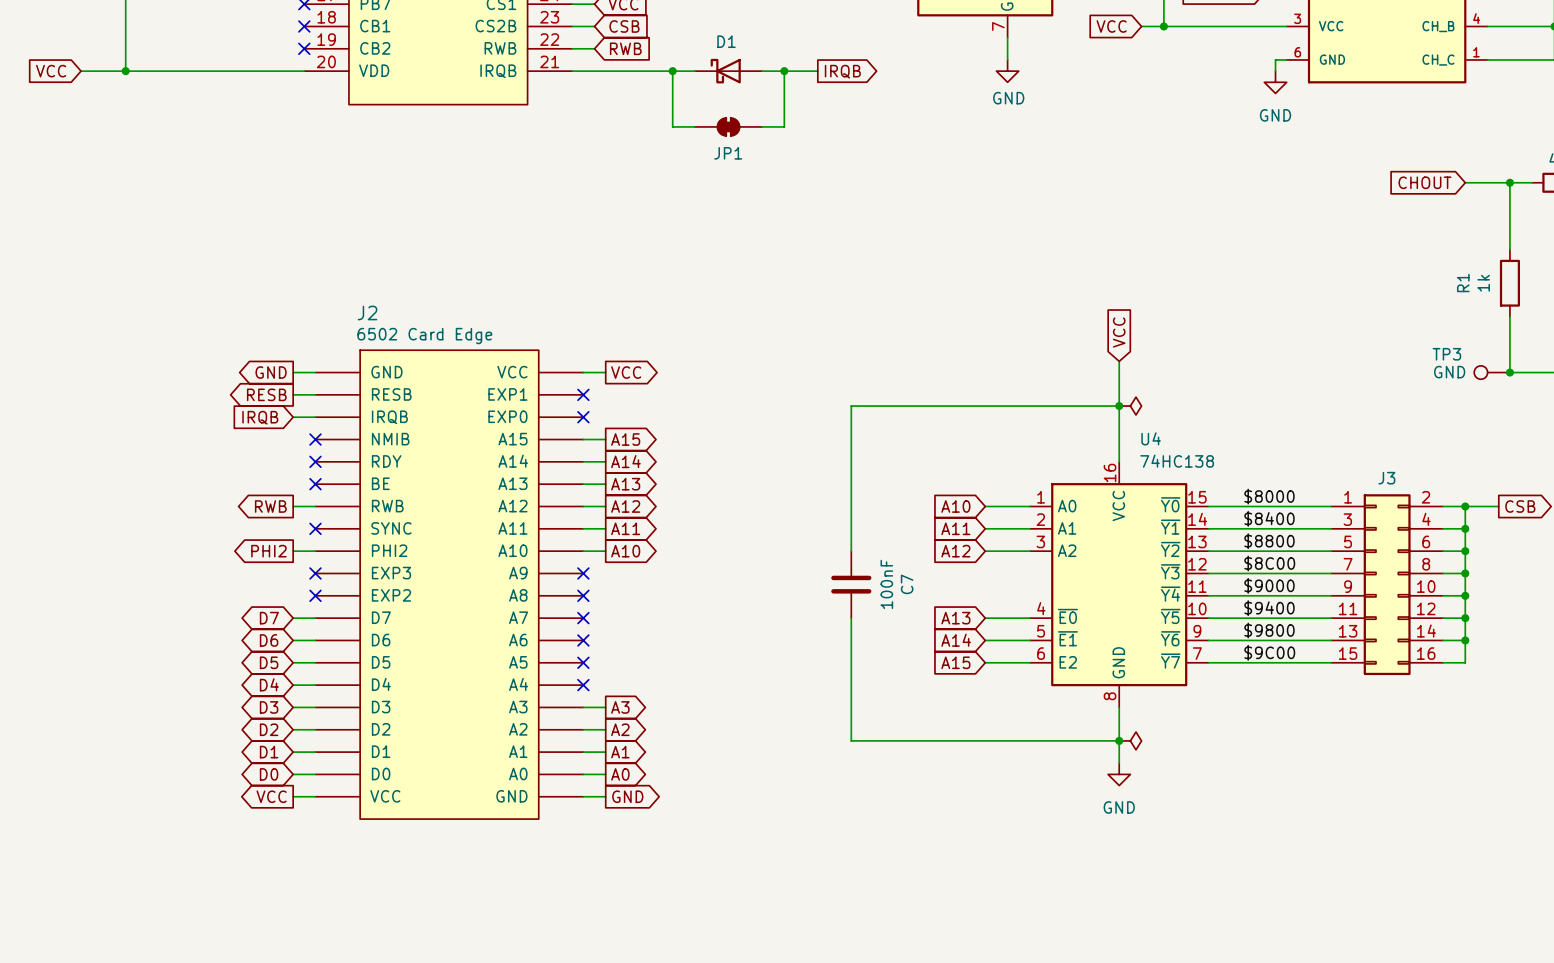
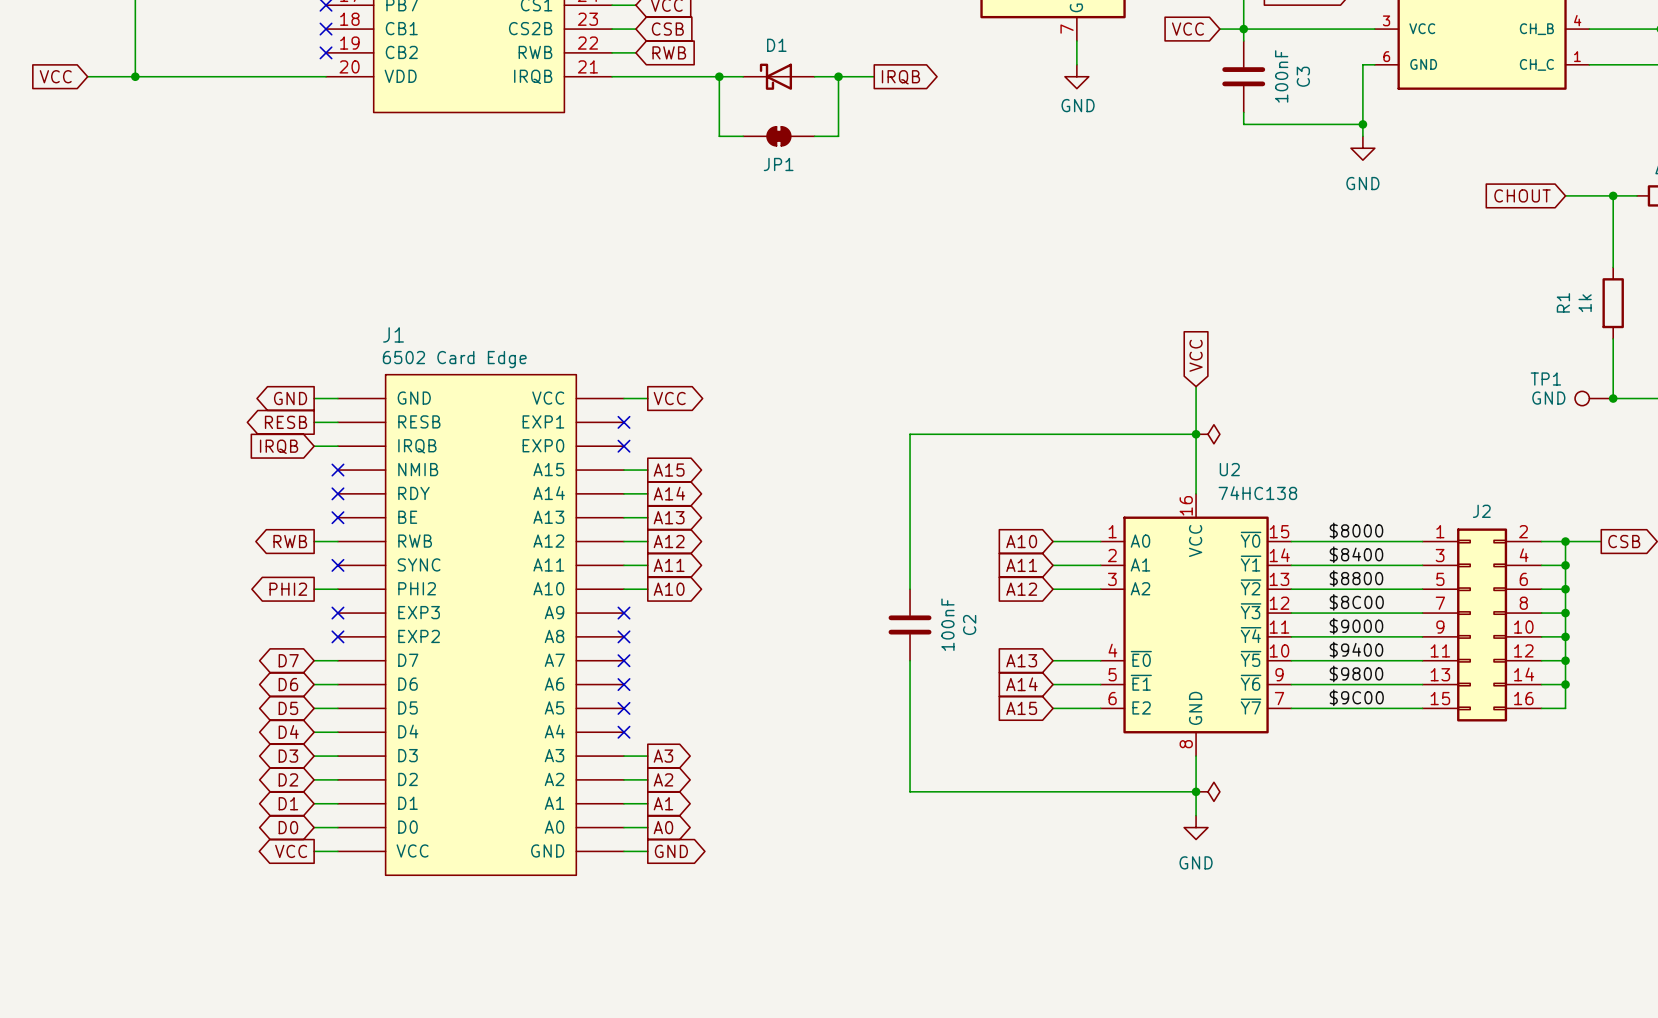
wire: none -> (1243, 29) (1243, 40)
C3: none -> 100nF (1243, 76)
wire: none -> (1362, 76) (1362, 136)
power symbol position: GND (1275, 82) -> GND (1362, 148)
wire: none -> (1243, 112) (1243, 124) (1362, 124)
junction: none -> (1362, 124)
J2 name: J2 (367, 312) -> J1 (393, 334)
TP3 name: TP3 (1446, 354) -> TP1 (1545, 379)
U4 name: U4 (1151, 438) -> U2 (1229, 469)
J3 name: J3 (1386, 478) -> J2 (1481, 511)
C7 name: C7 (907, 584) -> C2 (969, 624)

